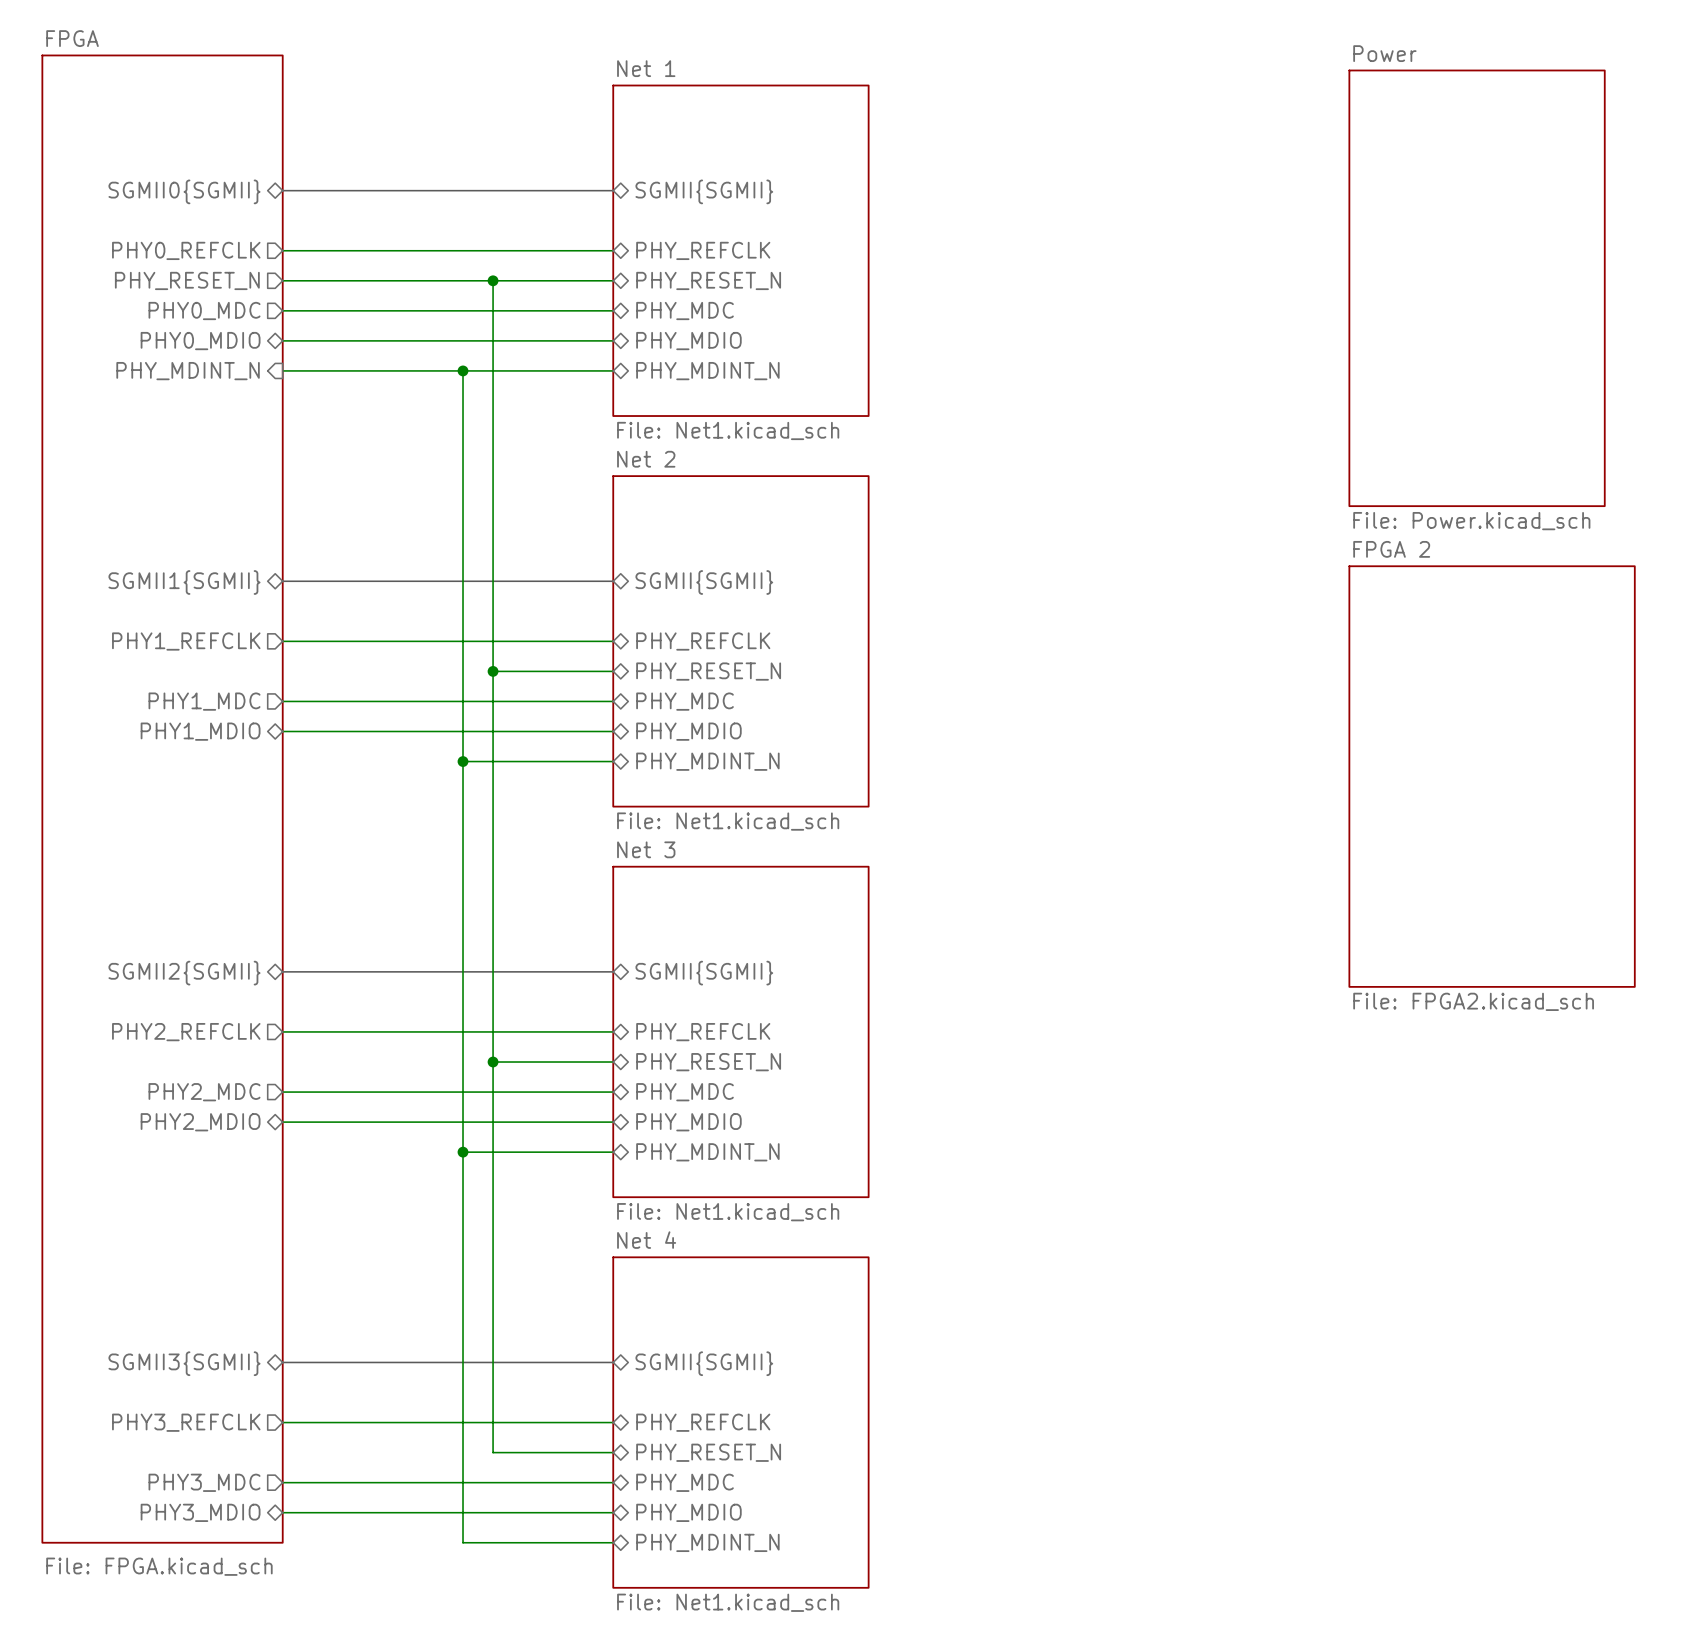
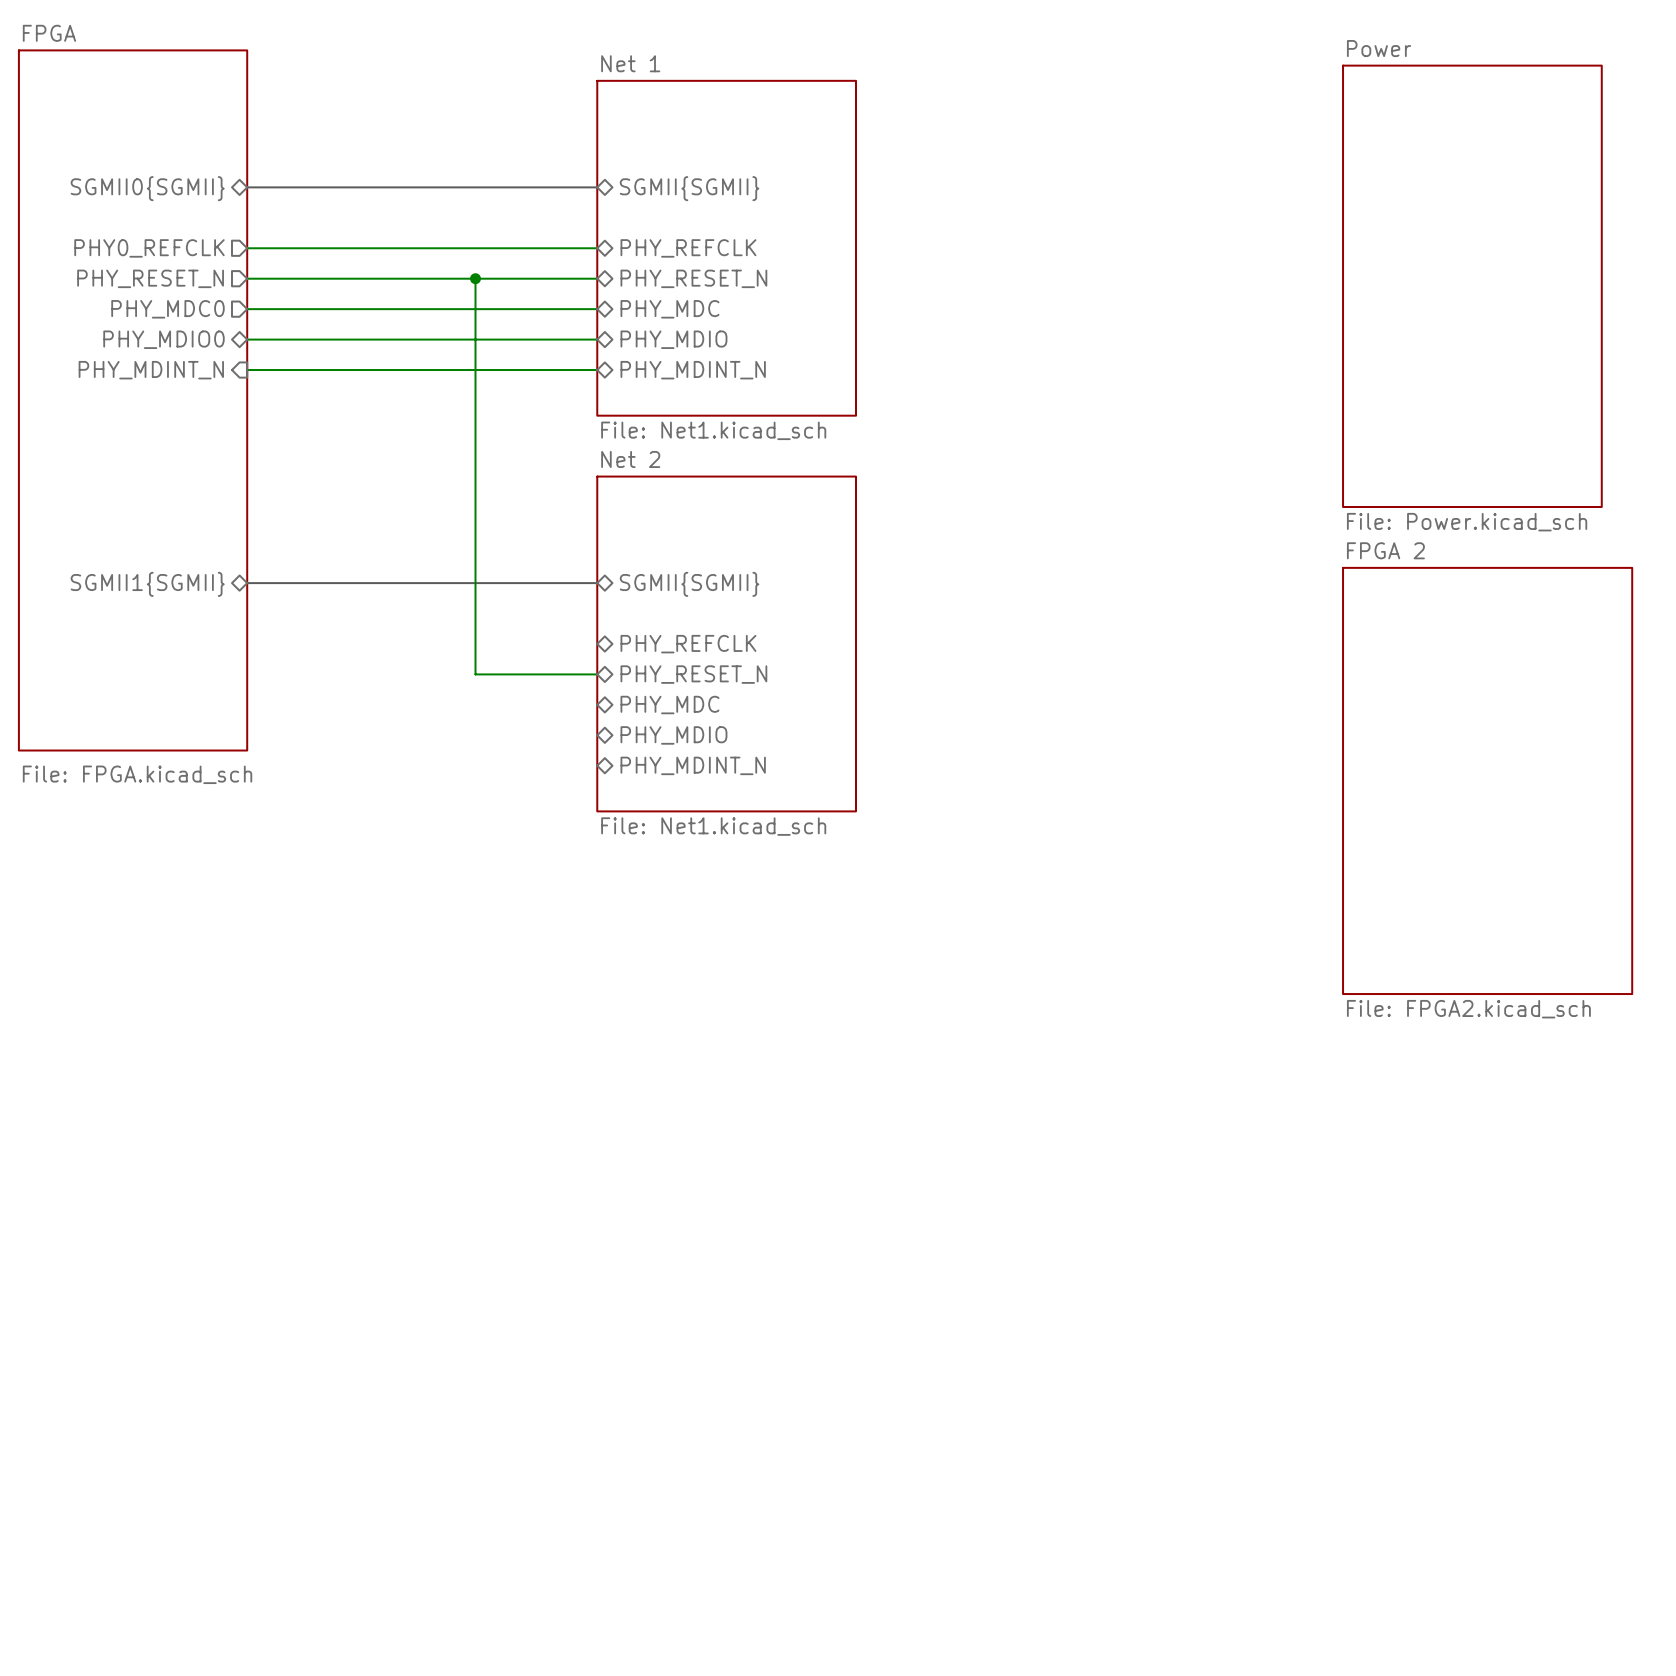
bus: none -> (247, 187) (262, 187)
sheet pin position: SGMII0{SGMII} (184, 191) -> SGMII0{SGMII} (147, 188)
sheet pin position: PHY0_REFCLK (186, 250) -> PHY0_REFCLK (149, 248)
wire: none -> (247, 248) (262, 248)
sheet pin position: PHY_RESET_N (187, 280) -> PHY_RESET_N (150, 278)
wire: none -> (247, 278) (262, 278)
wire: none -> (247, 309) (262, 309)
sheet pin: PHY0_MDC (204, 311) -> PHY_MDC0 (167, 309)
wire: none -> (247, 339) (262, 339)
sheet pin: PHY0_MDIO (200, 341) -> PHY_MDIO0 (163, 339)
wire: none -> (247, 370) (262, 370)
wire: (463, 370) (463, 1542) (613, 1542) -> none
junction: (463, 370) -> none
sheet pin position: PHY_MDINT_N (188, 371) -> PHY_MDINT_N (151, 370)
sheet FPGA: none -> File: FPGA.kicad_sch (133, 400)
bus: none -> (247, 583) (262, 583)
sheet pin position: SGMII1{SGMII} (184, 582) -> SGMII1{SGMII} (147, 584)
sheet pin: PHY1_REFCLK (186, 641) -> none
wire: (282, 641) (613, 641) -> none
wire: (493, 671) (493, 1452) (613, 1452) -> none
junction: (493, 671) -> none
sheet pin: PHY1_MDC (204, 701) -> none
wire: (282, 701) (613, 701) -> none
sheet pin: PHY1_MDIO (200, 731) -> none
wire: (282, 731) (613, 731) -> none
wire: (463, 761) (613, 761) -> none
junction: (463, 761) -> none
sheet FPGA: File: FPGA.kicad_sch (162, 799) -> none
bus: (282, 971) (613, 971) -> none
sheet pin: SGMII2{SGMII} (184, 973) -> none
sheet pin: SGMII{SGMII} (704, 973) -> none
wire: (282, 1031) (613, 1031) -> none
sheet Net 3: File: Net1.kicad_sch (740, 1031) -> none
sheet pin: PHY2_REFCLK (186, 1032) -> none
sheet pin: PHY_REFCLK (703, 1032) -> none
wire: (493, 1062) (613, 1062) -> none
junction: (493, 1062) -> none
sheet pin: PHY_RESET_N (708, 1062) -> none
sheet pin: PHY2_MDC (204, 1092) -> none
wire: (282, 1092) (613, 1092) -> none
sheet pin: PHY_MDC (685, 1092) -> none
sheet pin: PHY2_MDIO (200, 1122) -> none
wire: (282, 1122) (613, 1122) -> none
sheet pin: PHY_MDIO (688, 1122) -> none
wire: (463, 1152) (613, 1152) -> none
junction: (463, 1152) -> none
sheet pin: PHY_MDINT_N (707, 1152) -> none
bus: (282, 1362) (613, 1362) -> none
sheet pin: SGMII3{SGMII} (184, 1363) -> none
sheet pin: SGMII{SGMII} (704, 1363) -> none
sheet pin: PHY3_REFCLK (186, 1422) -> none
wire: (282, 1422) (613, 1422) -> none
sheet pin: PHY_REFCLK (703, 1422) -> none
sheet Net 4: File: Net1.kicad_sch (740, 1422) -> none
sheet pin: PHY_RESET_N (708, 1452) -> none
sheet pin: PHY3_MDC (204, 1482) -> none
wire: (282, 1482) (613, 1482) -> none
sheet pin: PHY_MDC (685, 1482) -> none
sheet pin: PHY3_MDIO (200, 1512) -> none
wire: (282, 1512) (613, 1512) -> none
sheet pin: PHY_MDIO (688, 1512) -> none
sheet pin: PHY_MDINT_N (707, 1542) -> none

